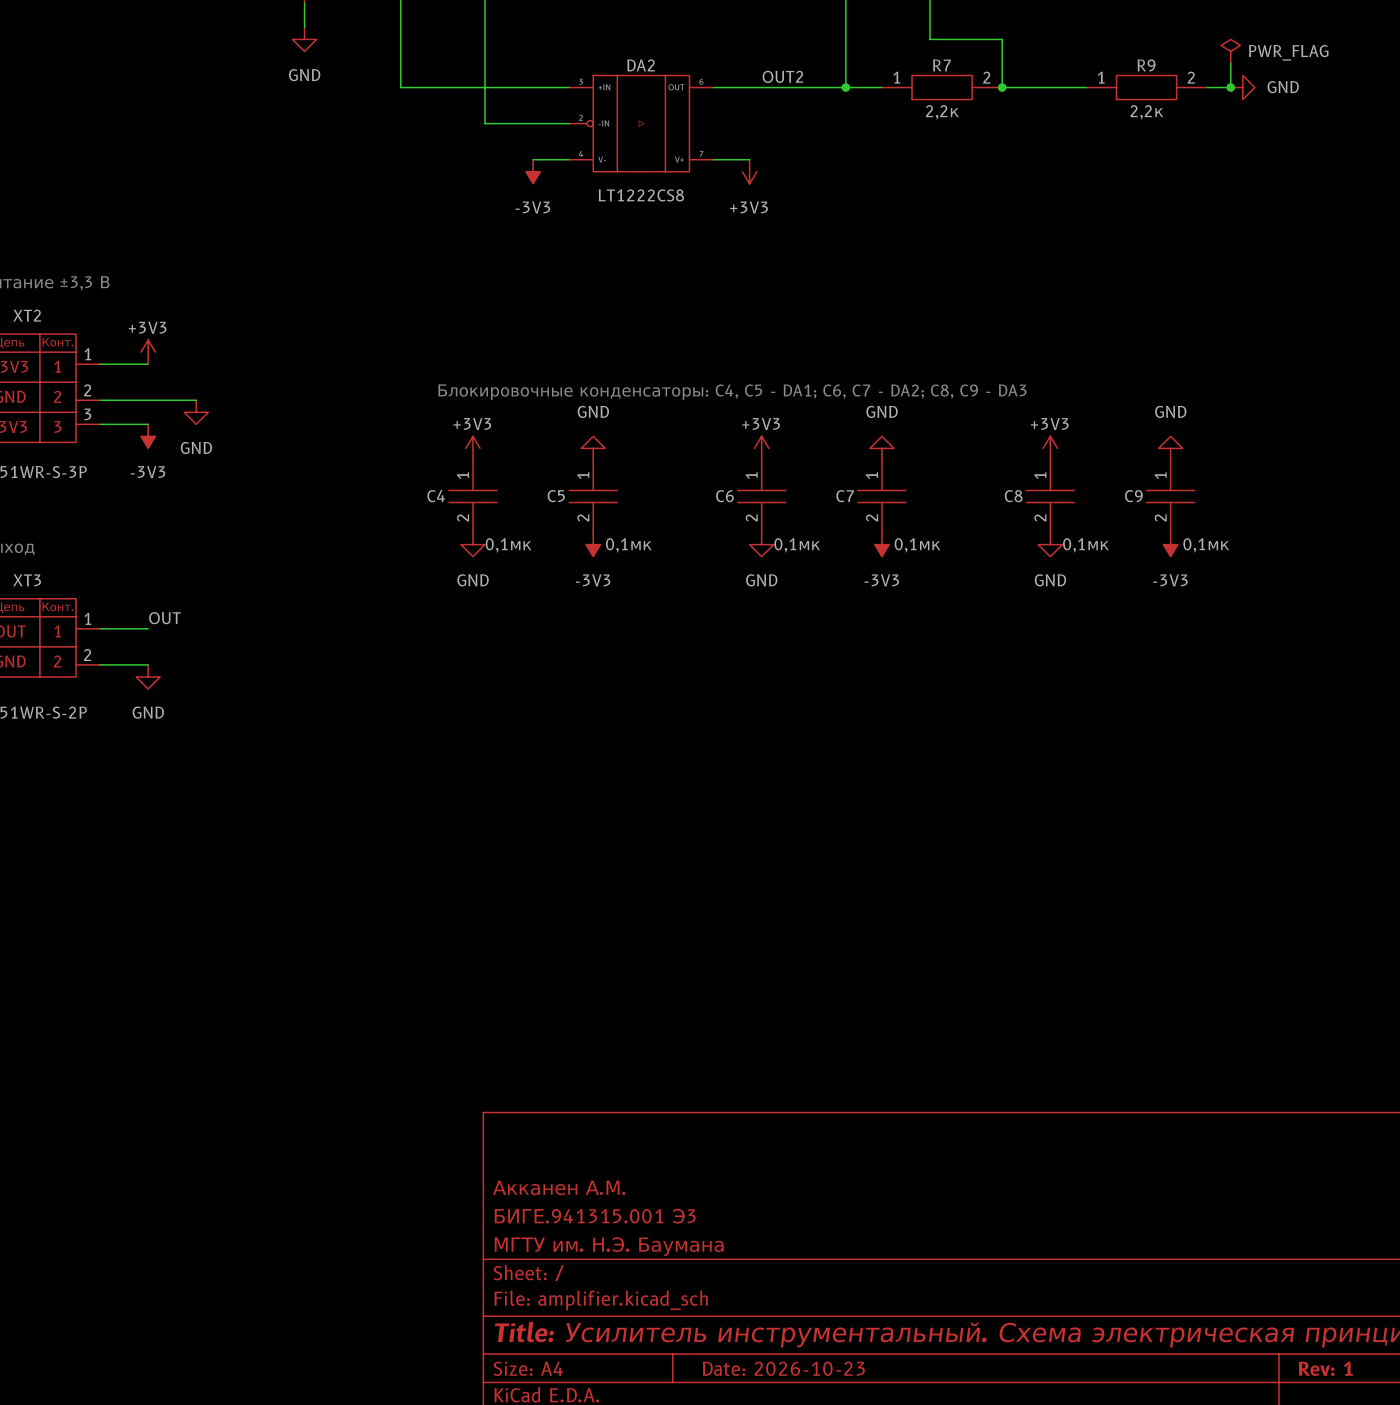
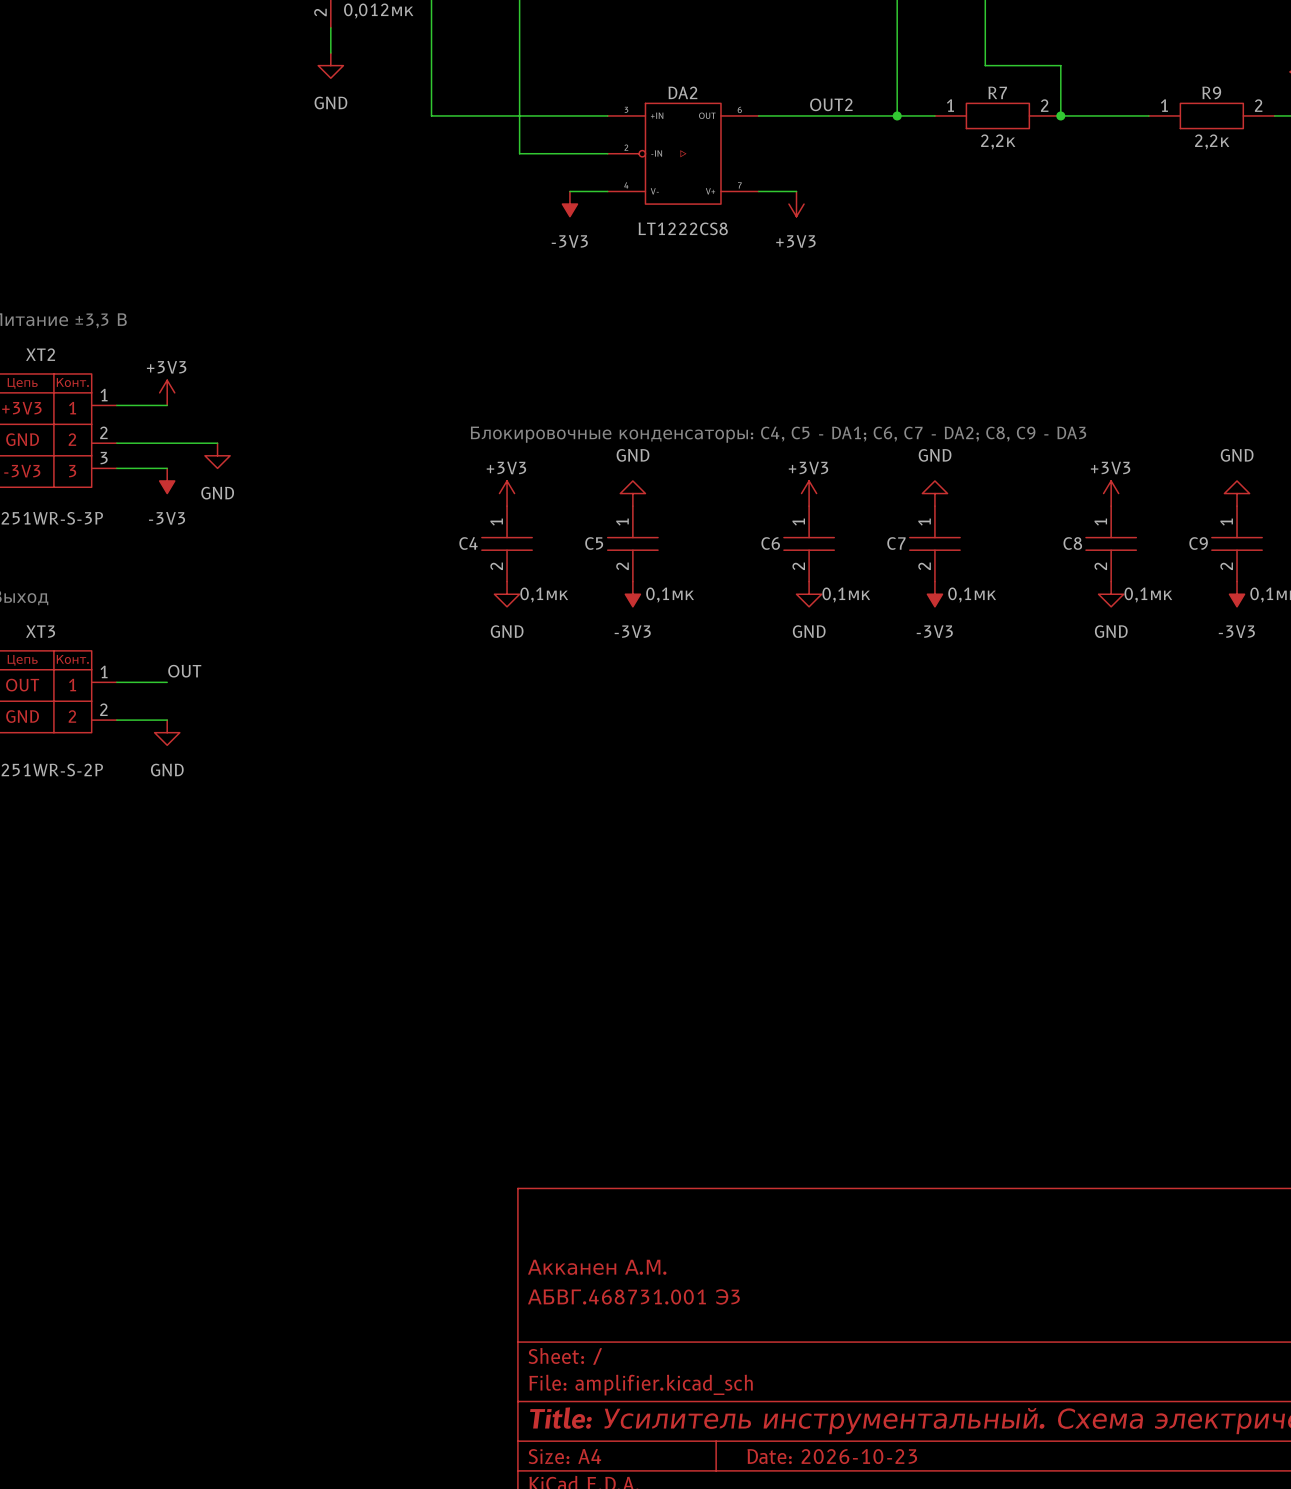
DA2 symbol: [569, 75, 714, 172] -> [607, 103, 759, 205]
title block: БИГЕ.941315.001 Э3 (595, 1216) -> АБВГ.468731.001 Э3 (633, 1296)
title block: МГТУ им. Н.Э. Баумана (609, 1246) -> none

